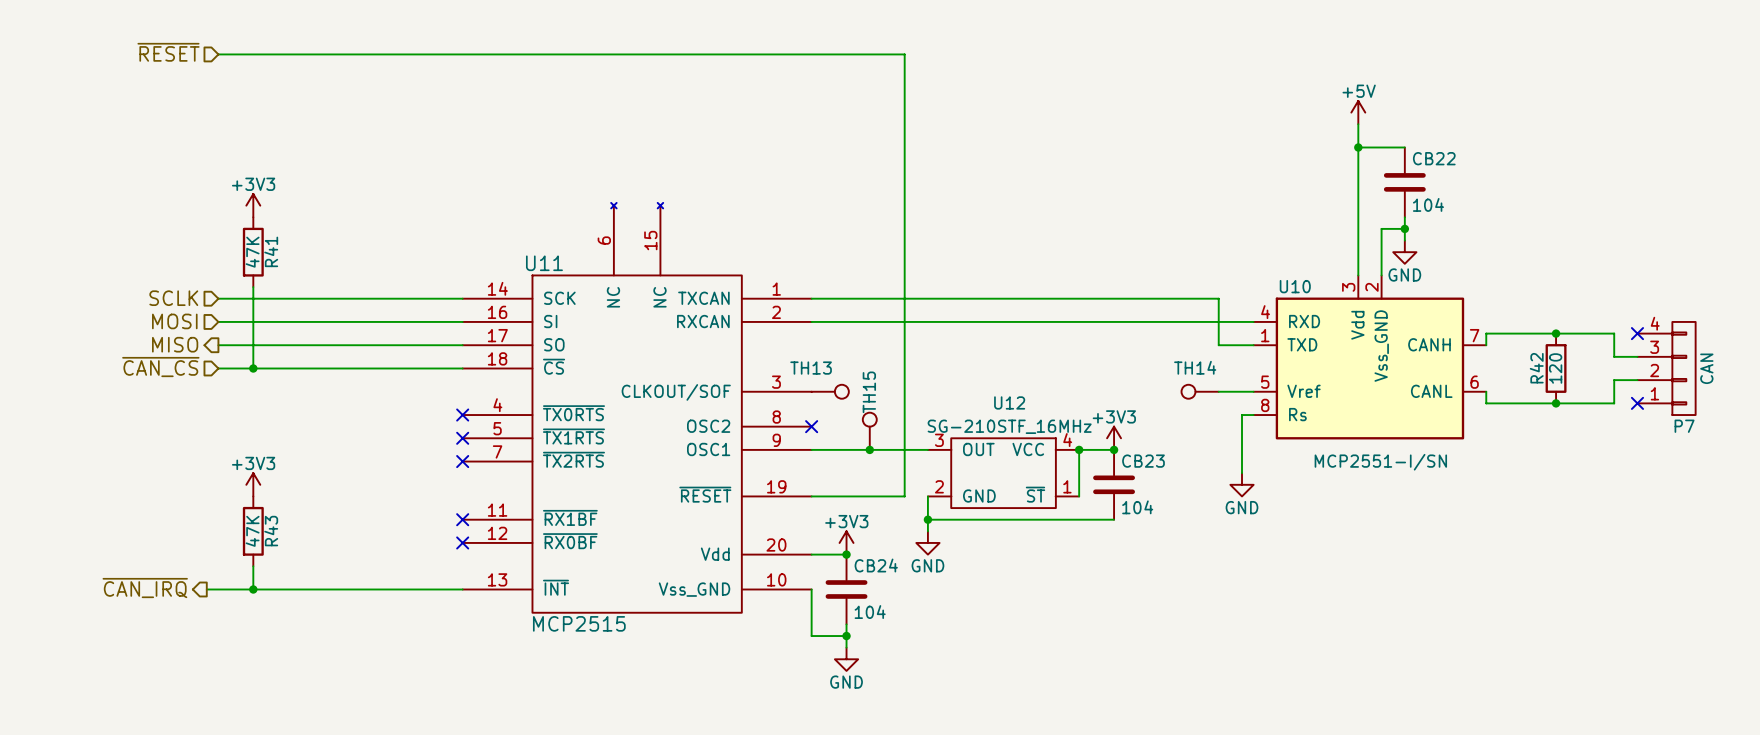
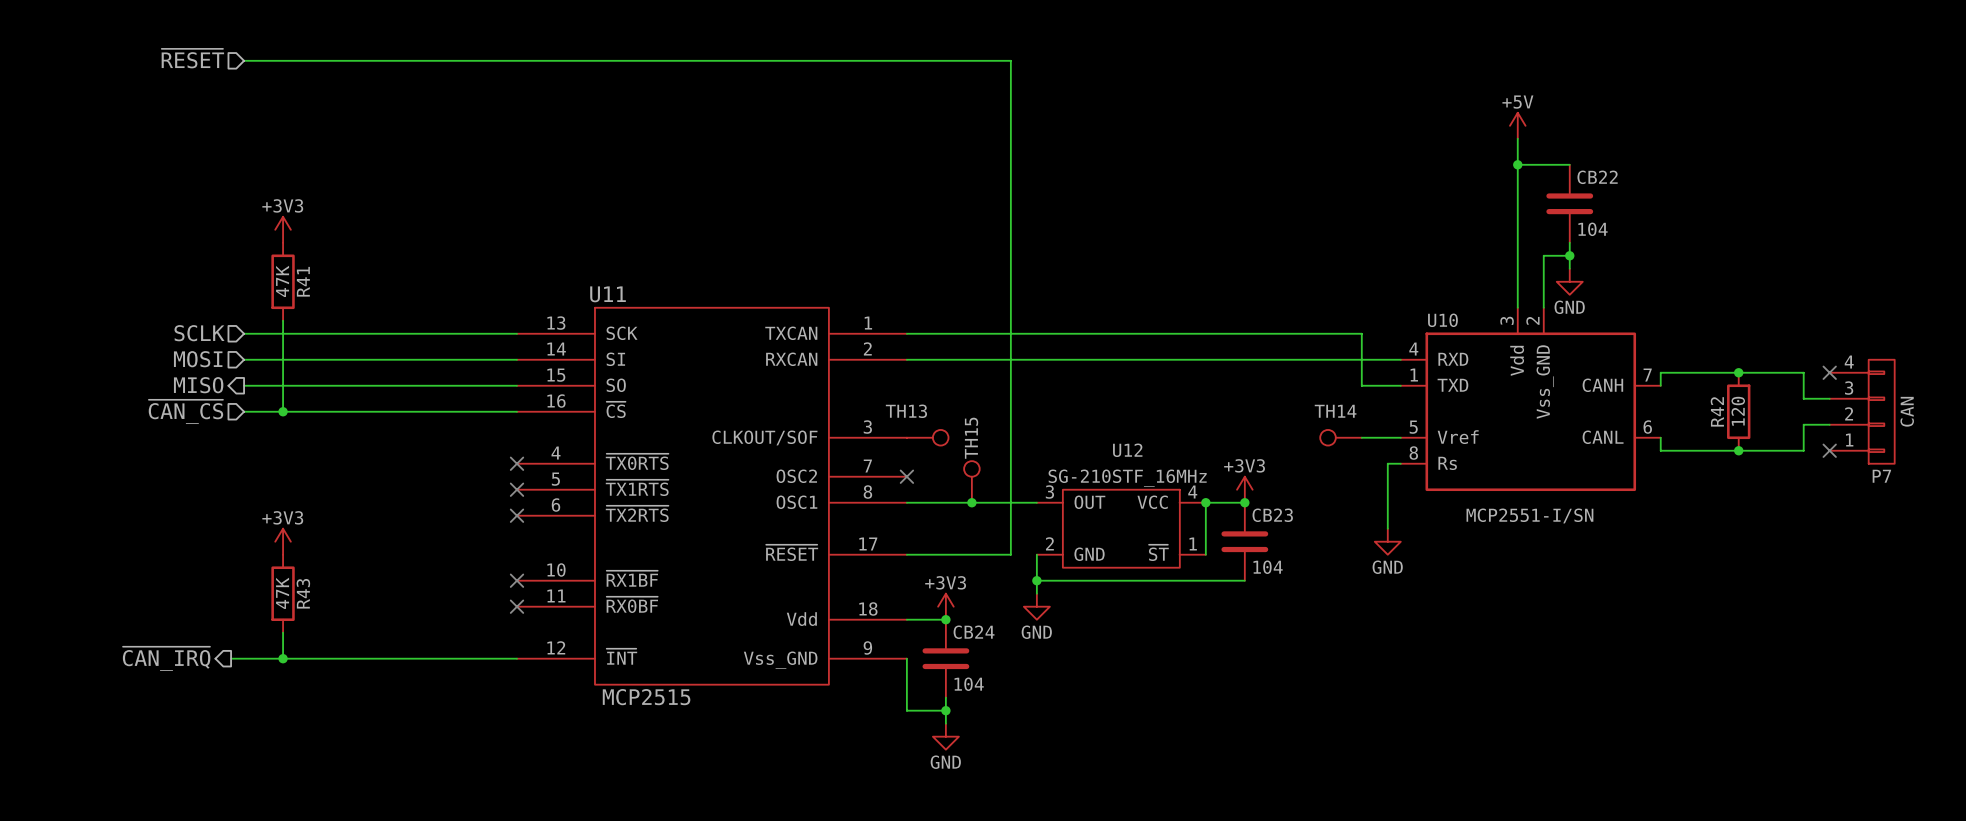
U11 symbol: [462, 202, 812, 613] -> [517, 307, 907, 685]

